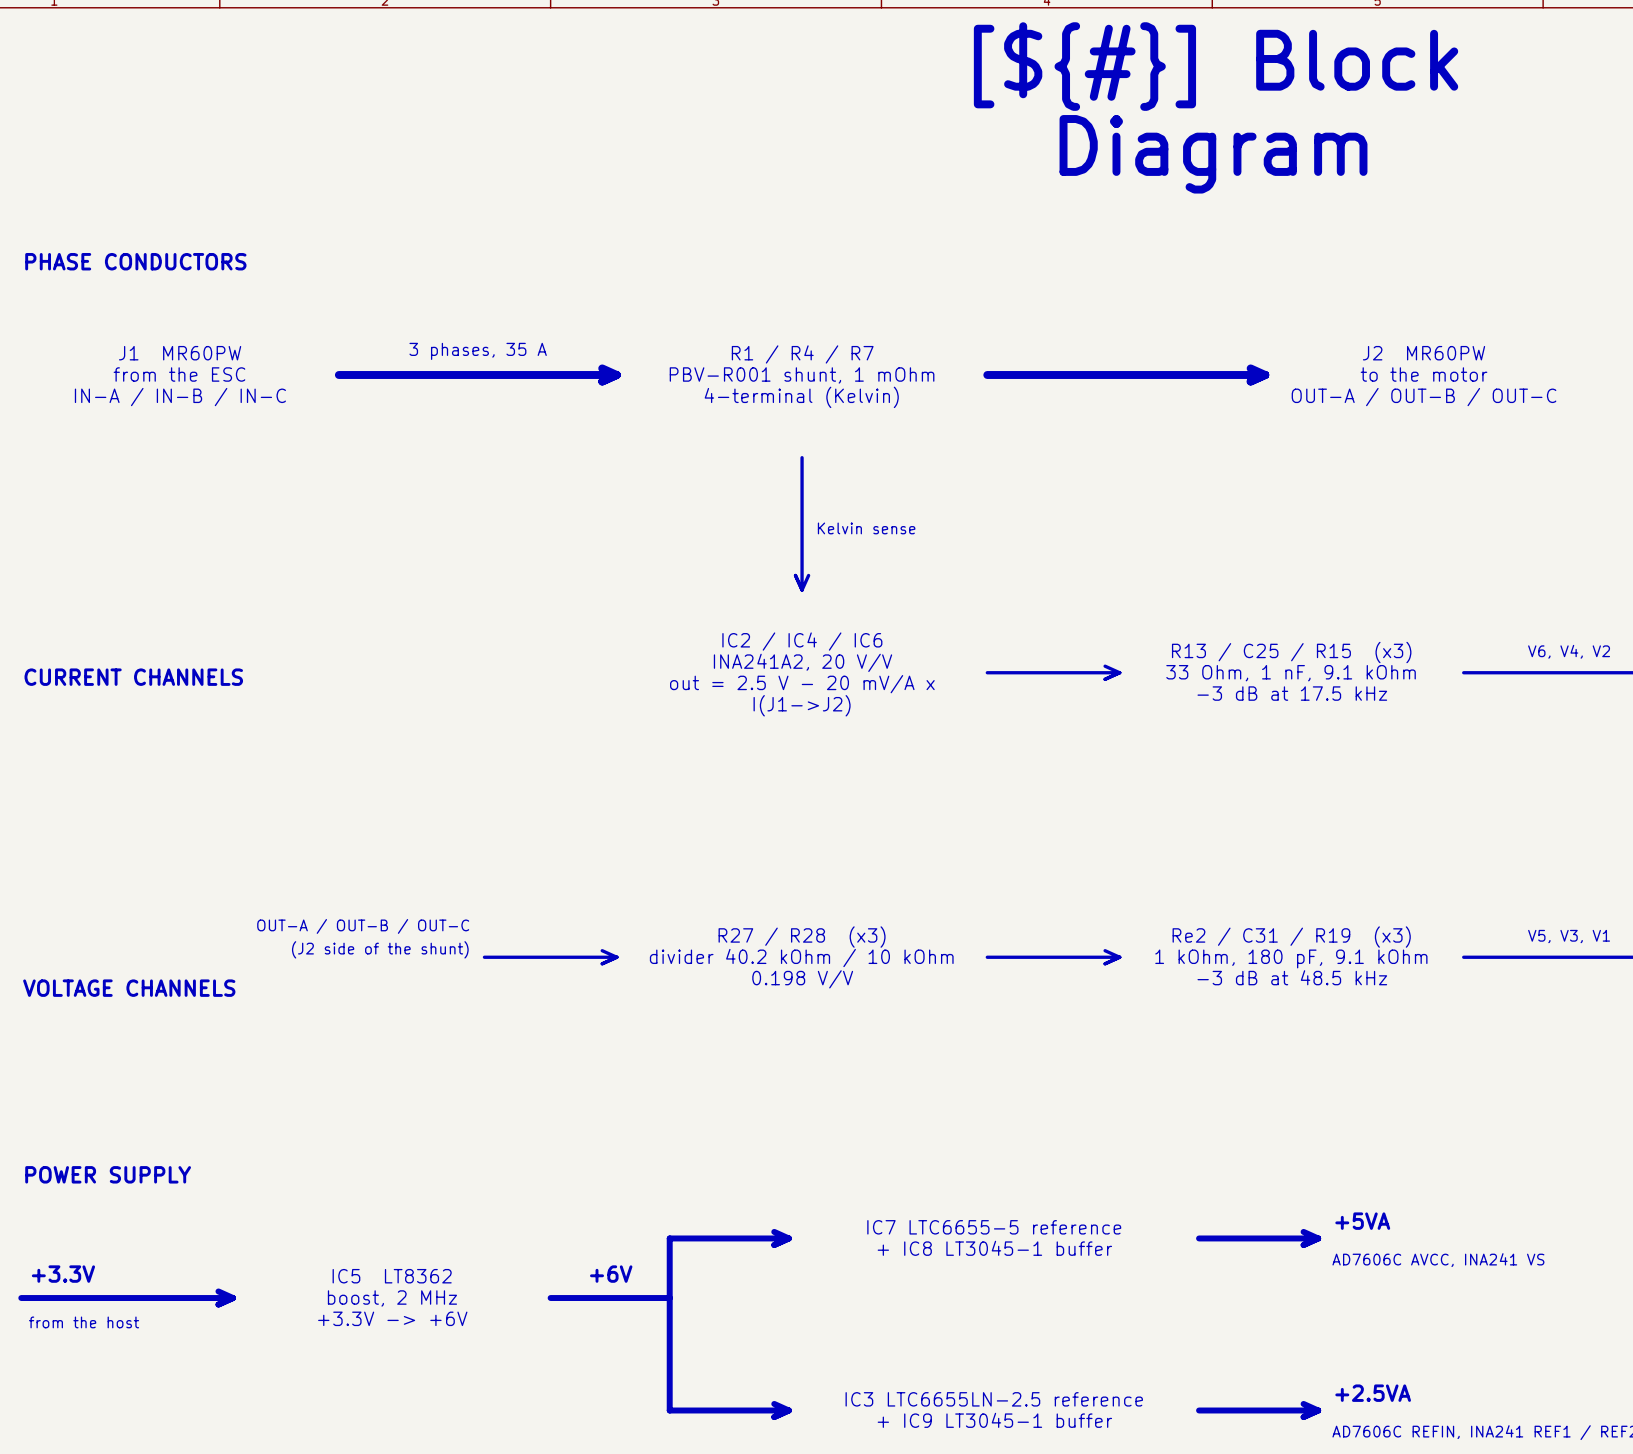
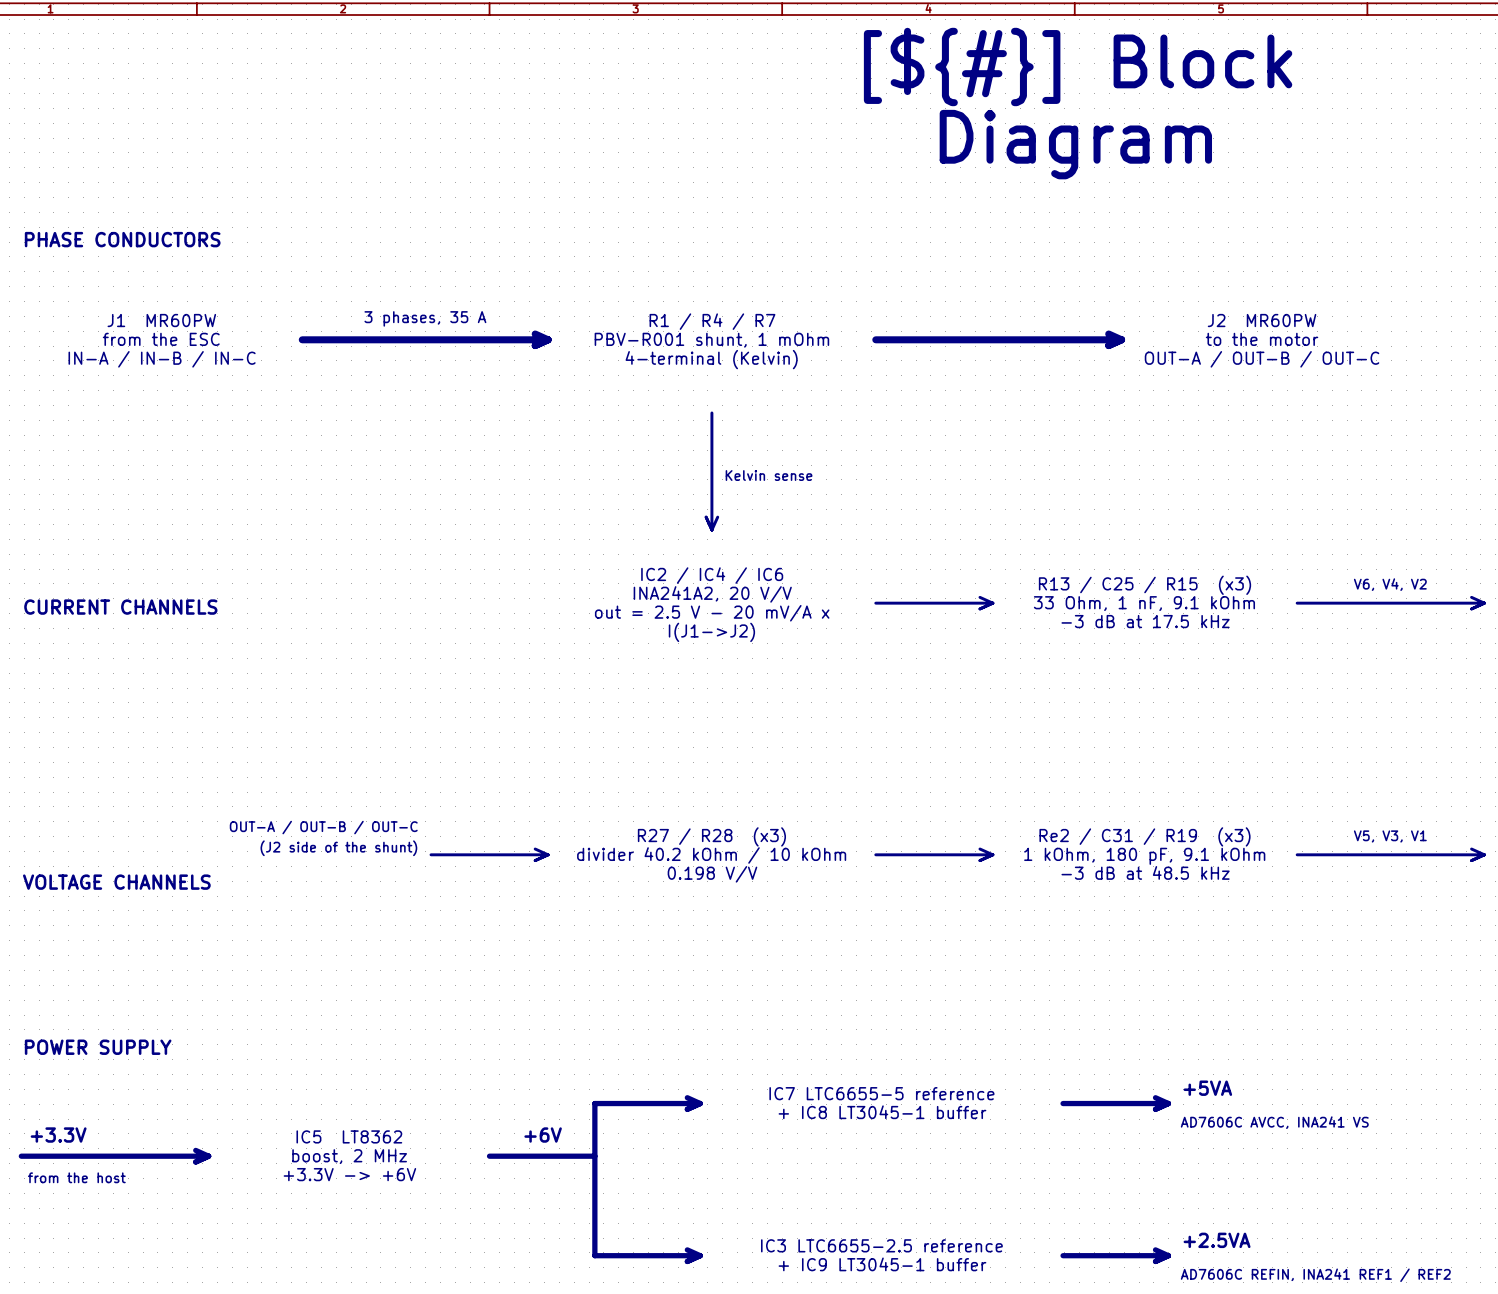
text: IC3 LTC6655LN-2.5 reference (994, 1399) -> IC3 LTC6655-2.5 reference (881, 1245)

